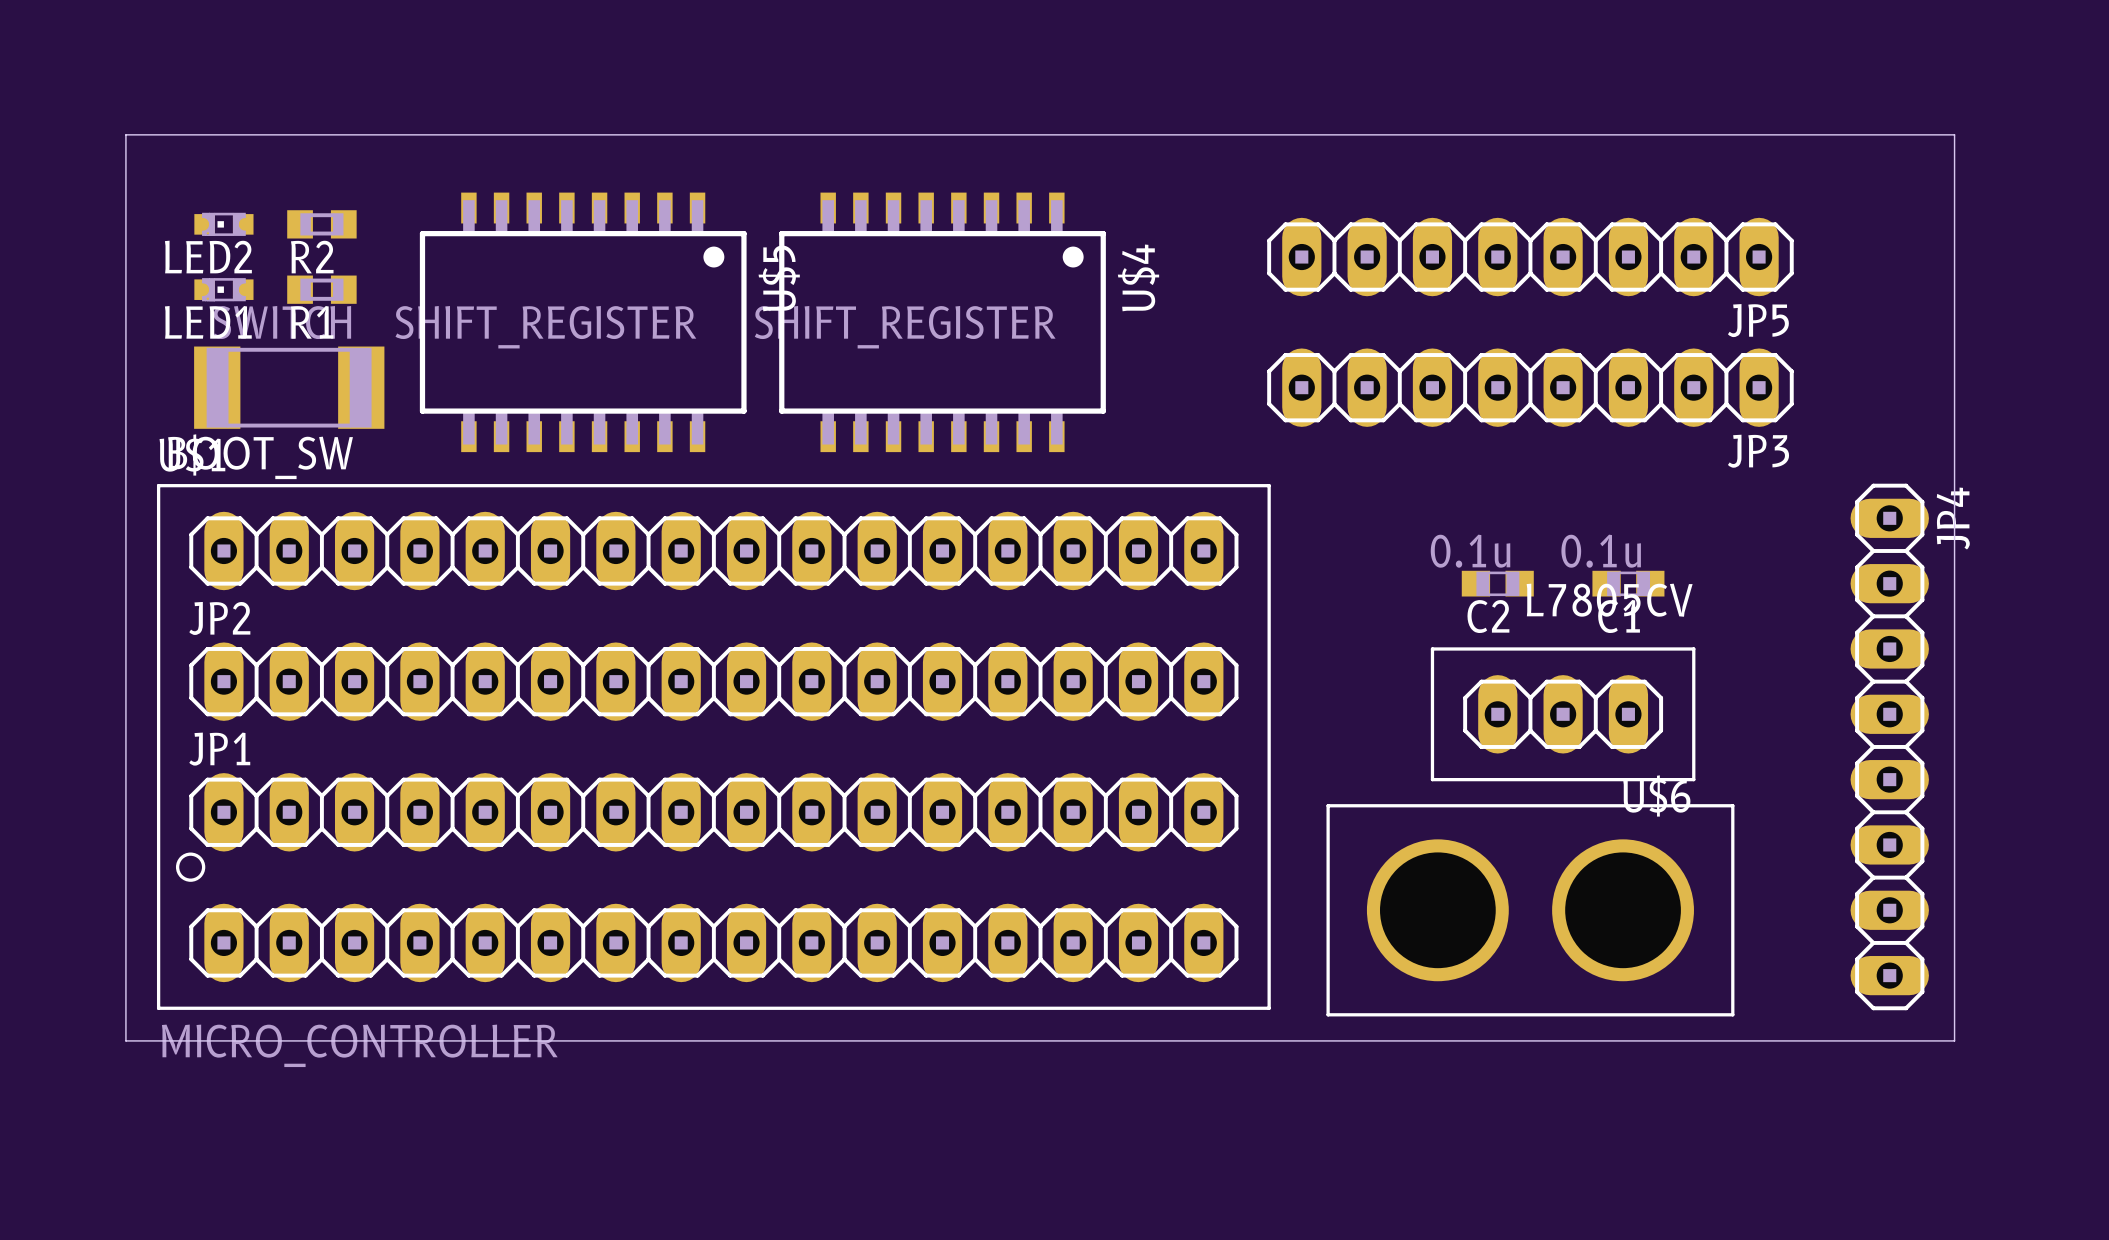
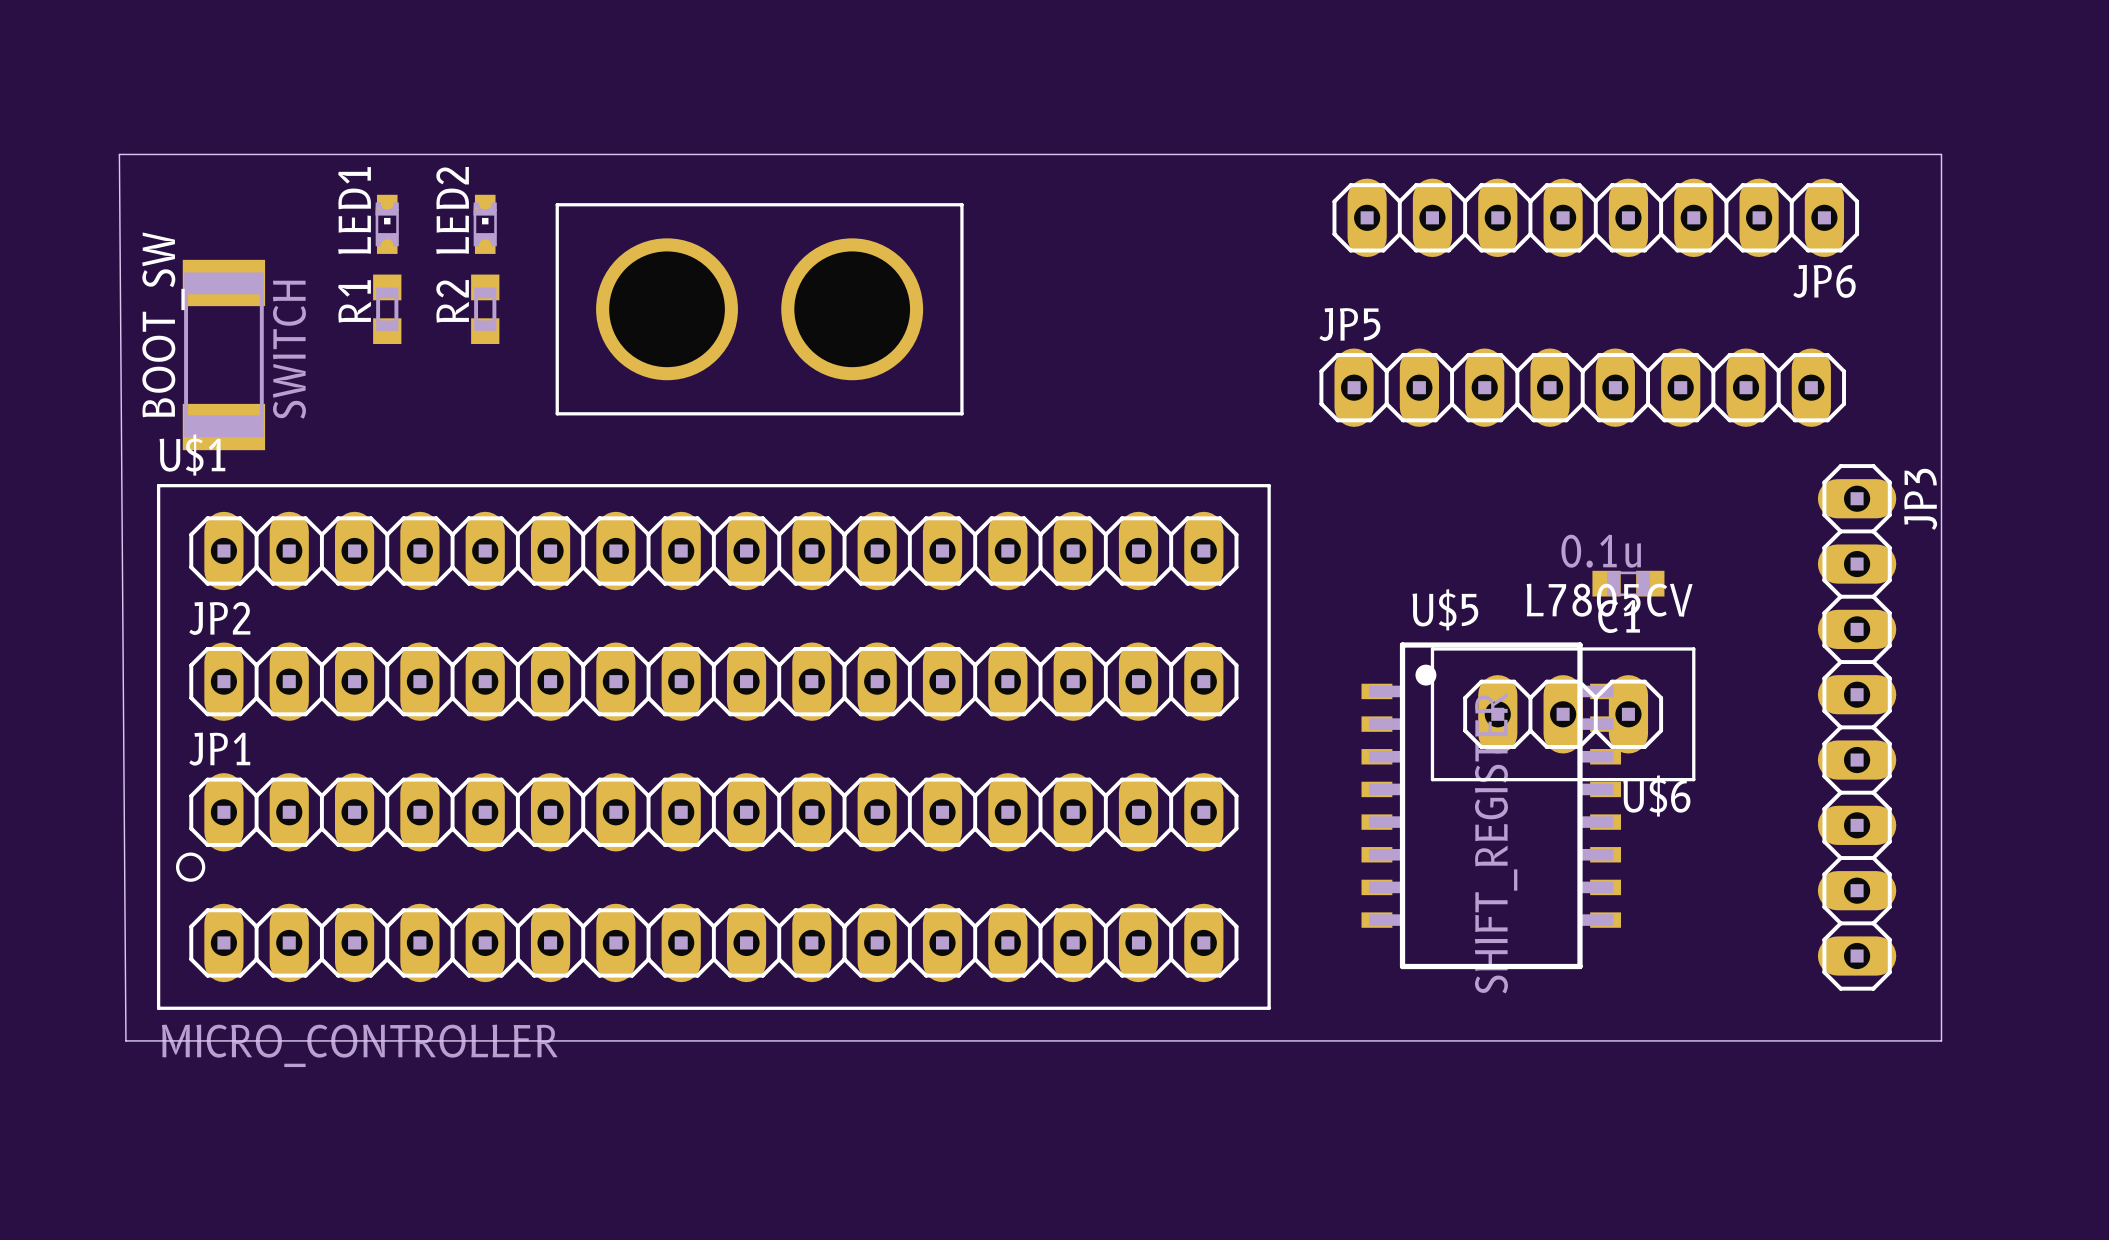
JP6: none -> (1595, 217)
LED2 rotation: 0° (223, 224) -> 90° clockwise (485, 224)
LED2 position: (223, 224) -> (485, 224)
R2 rotation: 0° (321, 224) -> 90° clockwise (485, 309)
R2 position: (321, 224) -> (485, 309)
JP5 position: (1530, 257) -> (1582, 387)
LED1 rotation: 0° (223, 289) -> 90° clockwise (387, 224)
LED1 position: (223, 289) -> (387, 224)
R1 rotation: 0° (321, 289) -> 90° clockwise (387, 309)
R1 position: (321, 289) -> (387, 309)
part: none -> (759, 309)
JP5 name position: JP5 (1758, 320) -> JP5 (1349, 324)
U$5 rotation: 0° (583, 322) -> 90° counterclockwise (1491, 805)
U$5 position: (583, 322) -> (1491, 805)
U$4: SHIFT_REGISTER (942, 322) -> none
BOOT_SW rotation: 0° (289, 387) -> 90° clockwise (223, 355)
JP3 rotation: 0° (1530, 387) -> 90° clockwise (1857, 727)
JP3 position: (1530, 387) -> (1857, 727)
JP3 name position: JP3 (1758, 451) -> JP3 (1920, 499)
C2: 0.1u (1497, 583) -> none
JP4: (1889, 746) -> none
part: (1530, 910) -> none
board edge: (125, 1040) (125, 134) (1954, 134) (1954, 1040) (1941, 1040) -> (125, 1040) (119, 154) (1941, 154) (1941, 1040)

